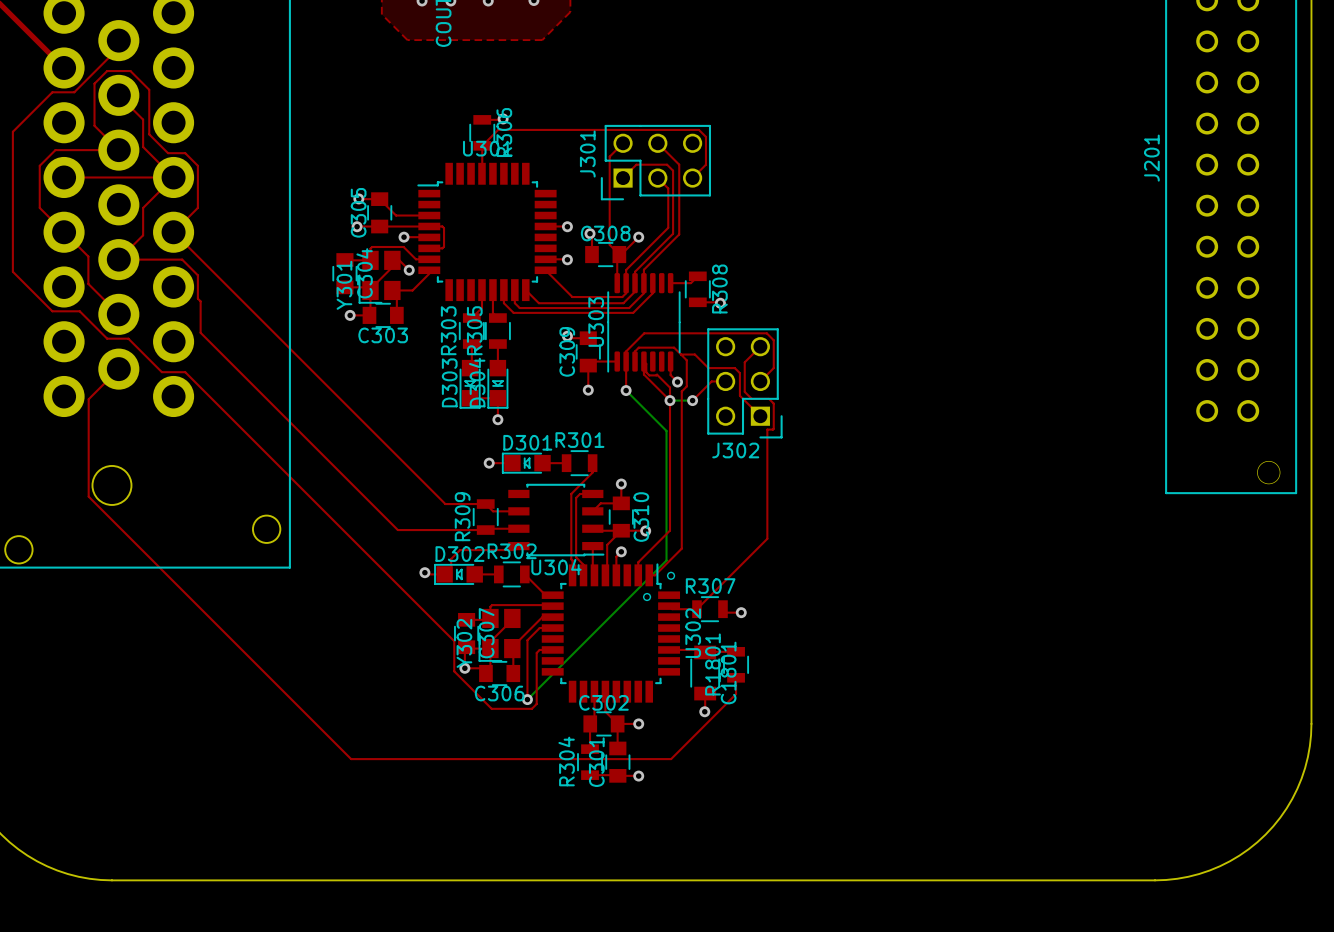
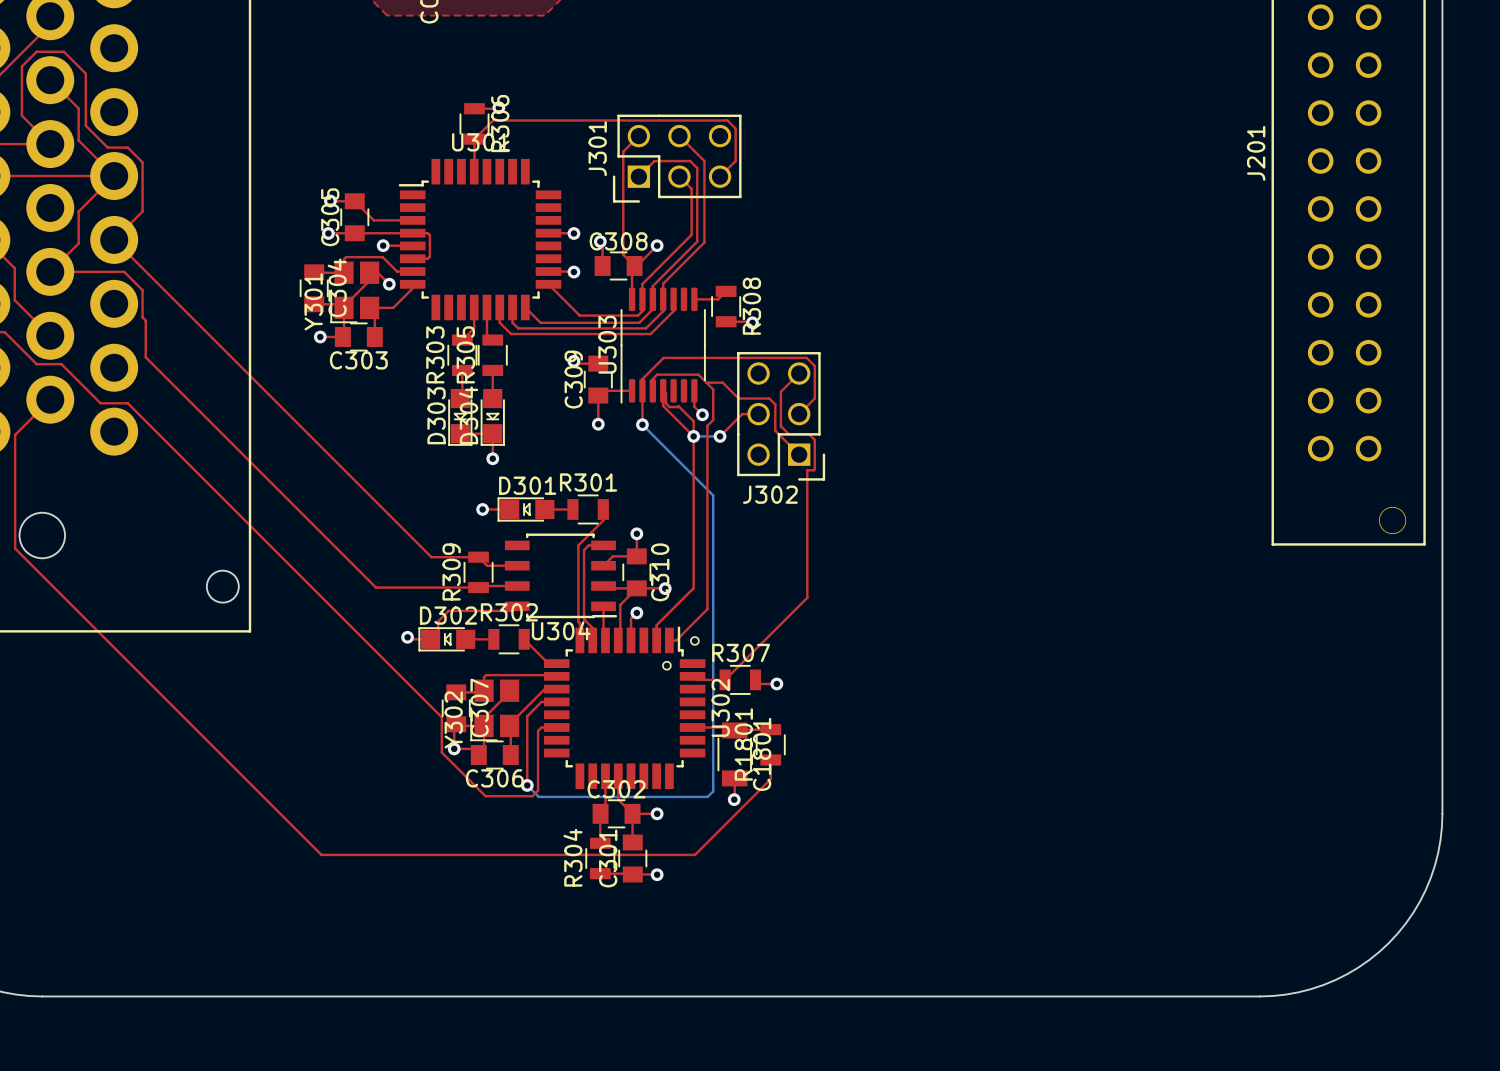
bottom track: (666, 430) (666, 560) (527, 699) -> (689, 471) (713, 495) (713, 791) (707, 796) (538, 796) (527, 785)

